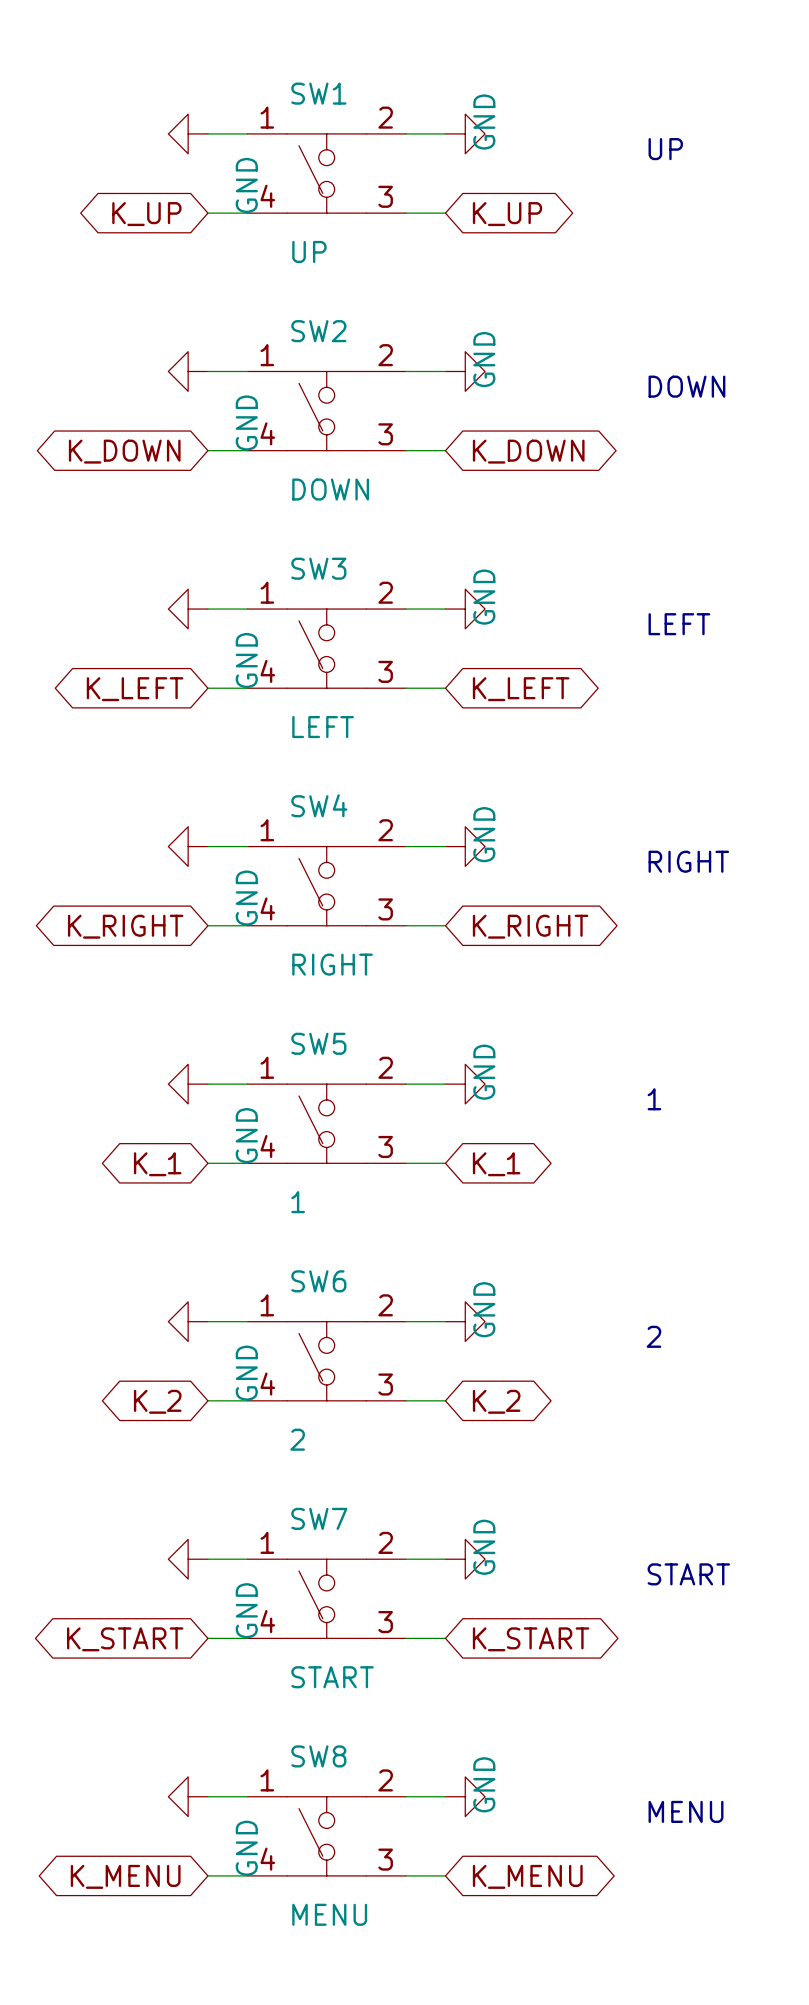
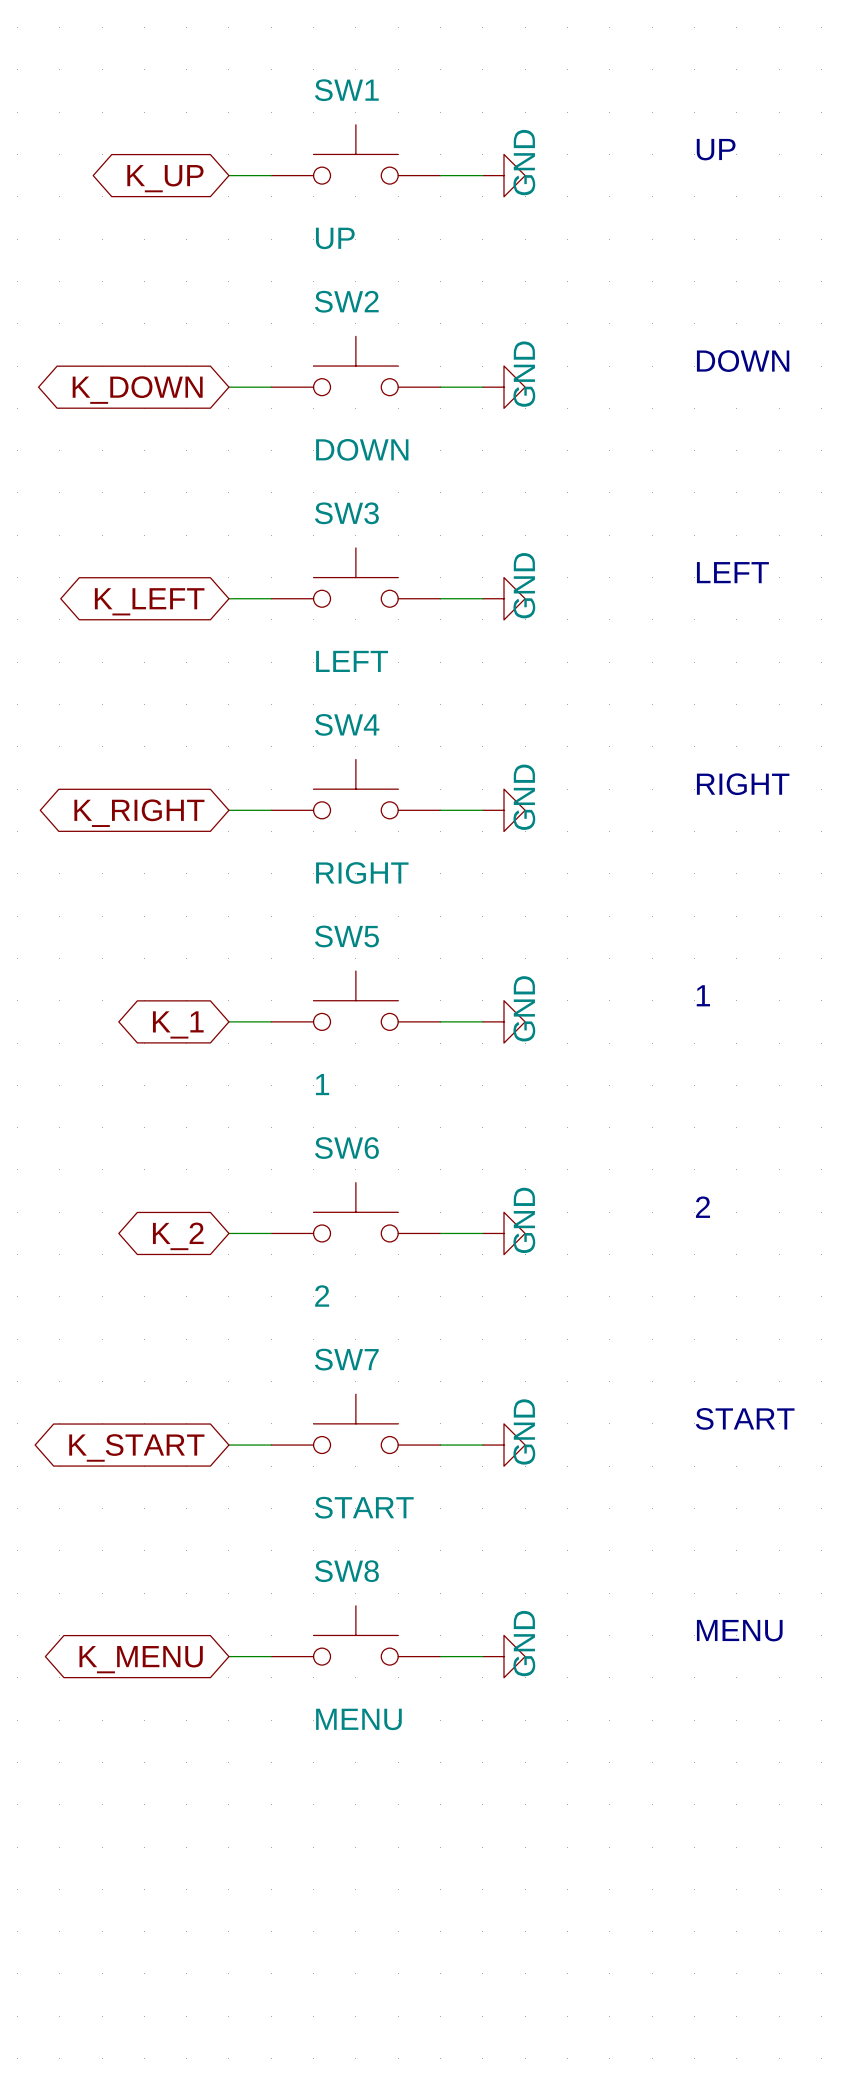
power symbol: GND (188, 133) -> none
wire: (207, 133) (247, 133) -> (228, 175) (271, 175)
SW1 symbol: [247, 133, 406, 214] -> [271, 124, 441, 185]
wire: (405, 133) (445, 133) -> (440, 175) (482, 175)
power symbol position: GND (465, 133) -> GND (503, 175)
wire: (207, 213) (247, 213) -> none
wire: (405, 213) (445, 213) -> none
global label position: K_UP (146, 214) -> K_UP (165, 178)
global label: K_UP (507, 214) -> none
power symbol: GND (188, 371) -> none
SW2 symbol: [247, 371, 406, 451] -> [271, 336, 441, 396]
text position: DOWN (686, 386) -> DOWN (743, 361)
wire: (207, 450) (247, 450) -> none
wire: (405, 450) (445, 450) -> none
global label position: K_DOWN (124, 451) -> K_DOWN (137, 390)
global label: K_DOWN (528, 451) -> none
power symbol: GND (188, 609) -> none
wire: (207, 609) (247, 609) -> (228, 598) (271, 598)
SW3 symbol: [247, 609, 406, 689] -> [271, 547, 441, 608]
wire: (405, 609) (445, 609) -> (440, 598) (482, 598)
power symbol position: GND (465, 609) -> GND (503, 598)
text position: LEFT (679, 624) -> LEFT (732, 572)
wire: (207, 688) (247, 688) -> (228, 810) (271, 810)
wire: (405, 688) (445, 688) -> (440, 810) (482, 810)
global label position: K_LEFT (135, 689) -> K_LEFT (149, 601)
global label: K_LEFT (521, 689) -> none
power symbol: none -> GND (503, 810)
global label: none -> K_RIGHT (139, 813)
power symbol: GND (188, 846) -> none
wire: (207, 846) (247, 846) -> none
SW4 symbol: [247, 846, 406, 926] -> [271, 759, 441, 819]
wire: (405, 846) (445, 846) -> none
power symbol: GND (465, 846) -> none
text position: RIGHT (688, 861) -> RIGHT (743, 784)
wire: (207, 925) (247, 925) -> (228, 1021) (271, 1021)
wire: (405, 925) (445, 925) -> (440, 1021) (482, 1021)
global label: K_RIGHT (125, 926) -> none
global label: K_RIGHT (530, 926) -> none
power symbol: none -> GND (503, 1021)
power symbol: GND (188, 1084) -> none
wire: (207, 1084) (247, 1084) -> none
SW5 symbol: [247, 1084, 406, 1164] -> [271, 971, 441, 1031]
wire: (405, 1084) (445, 1084) -> none
power symbol: GND (465, 1084) -> none
text position: 1 (654, 1099) -> 1 (703, 995)
text: none -> 2 (702, 1207)
power symbol: none -> GND (503, 1233)
global label: K_1 (157, 1164) -> K_2 (178, 1236)
global label rotation: 0° (496, 1164) -> 180° (178, 1024)
global label position: K_1 (496, 1164) -> K_1 (178, 1024)
power symbol: GND (188, 1321) -> none
wire: (207, 1321) (247, 1321) -> (228, 1445) (271, 1445)
SW6 symbol: [247, 1321, 406, 1401] -> [271, 1182, 441, 1242]
wire: (405, 1321) (445, 1321) -> (440, 1445) (482, 1445)
power symbol position: GND (465, 1321) -> GND (503, 1445)
text: 2 (653, 1336) -> START (745, 1418)
global label: none -> K_START (136, 1447)
wire: (207, 1400) (247, 1400) -> none
wire: (405, 1400) (445, 1400) -> none
global label: K_2 (157, 1401) -> none
global label: K_2 (496, 1401) -> none
power symbol: GND (188, 1559) -> none
SW7 symbol: [247, 1559, 406, 1639] -> [271, 1394, 441, 1454]
global label: none -> K_MENU (141, 1659)
text: START (688, 1574) -> none
wire: (207, 1638) (247, 1638) -> none
wire: (405, 1638) (445, 1638) -> none
global label: K_START (125, 1639) -> none
global label: K_START (531, 1639) -> none
power symbol: GND (188, 1796) -> none
wire: (207, 1796) (247, 1796) -> none
SW8 symbol: [247, 1796, 406, 1876] -> [271, 1605, 441, 1666]
wire: (405, 1796) (445, 1796) -> none
power symbol: GND (465, 1796) -> none
text position: MENU (686, 1811) -> MENU (739, 1630)
wire: (207, 1875) (247, 1875) -> none
wire: (405, 1875) (445, 1875) -> none
global label: K_MENU (125, 1876) -> none
global label: K_MENU (527, 1876) -> none

